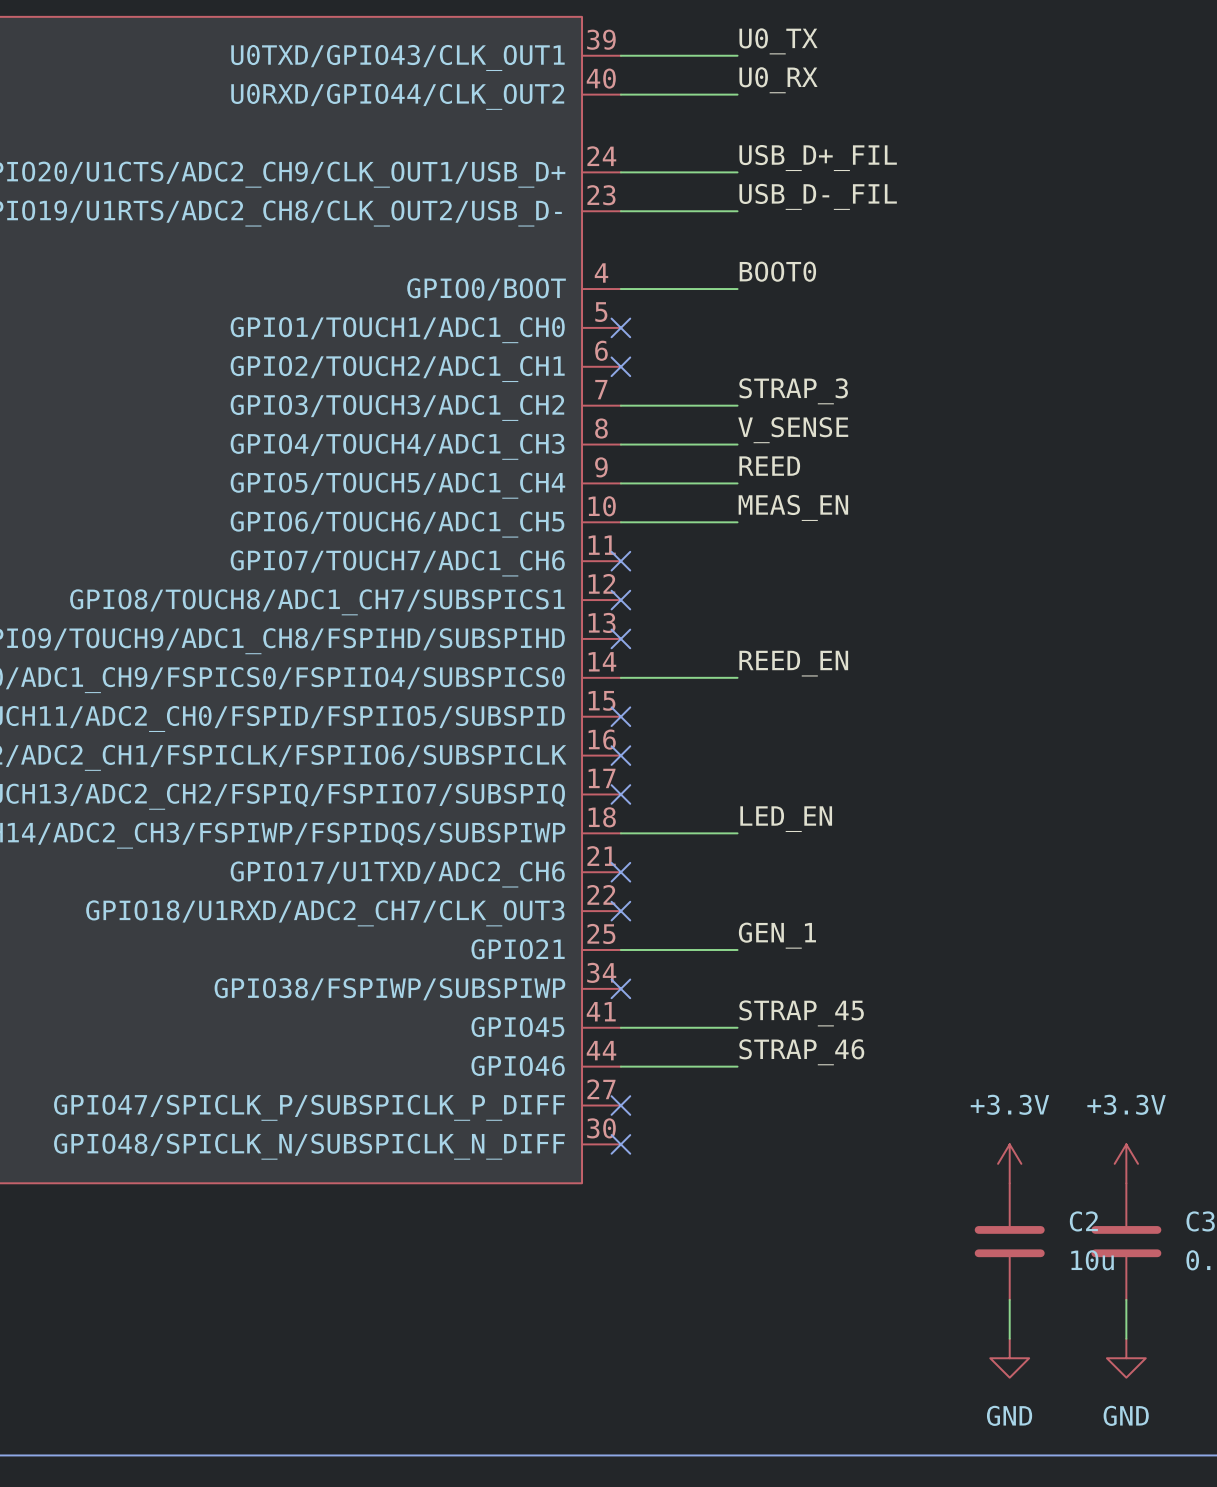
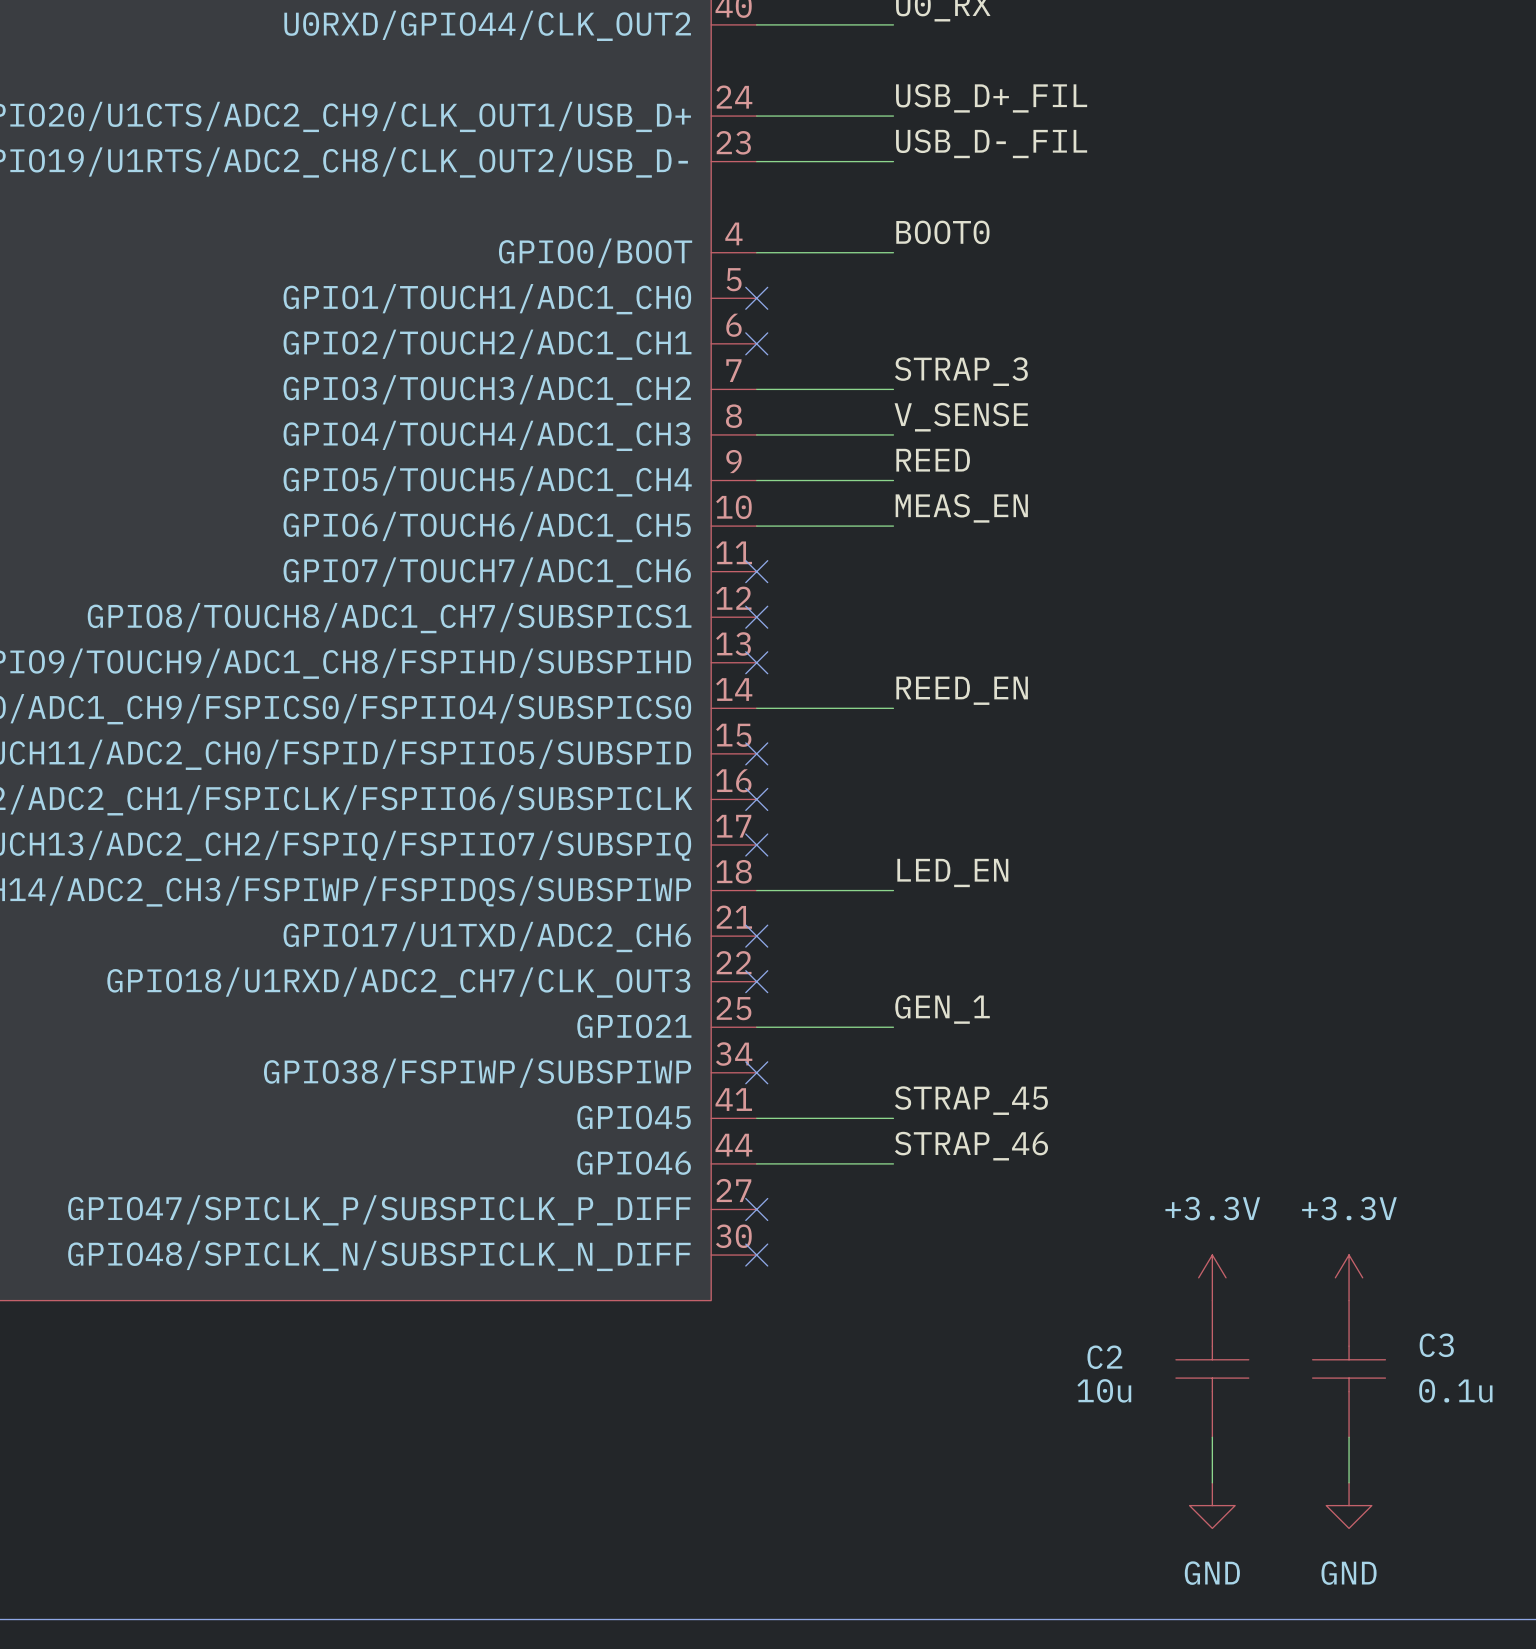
C2 symbol: [974, 1183, 1045, 1300] -> [1175, 1300, 1249, 1438]
C3 symbol: [1091, 1183, 1162, 1300] -> [1312, 1300, 1386, 1438]
C2 name position: C2 (1083, 1221) -> C2 (1104, 1357)
C2 value position: 10u (1092, 1260) -> 10u (1104, 1390)

